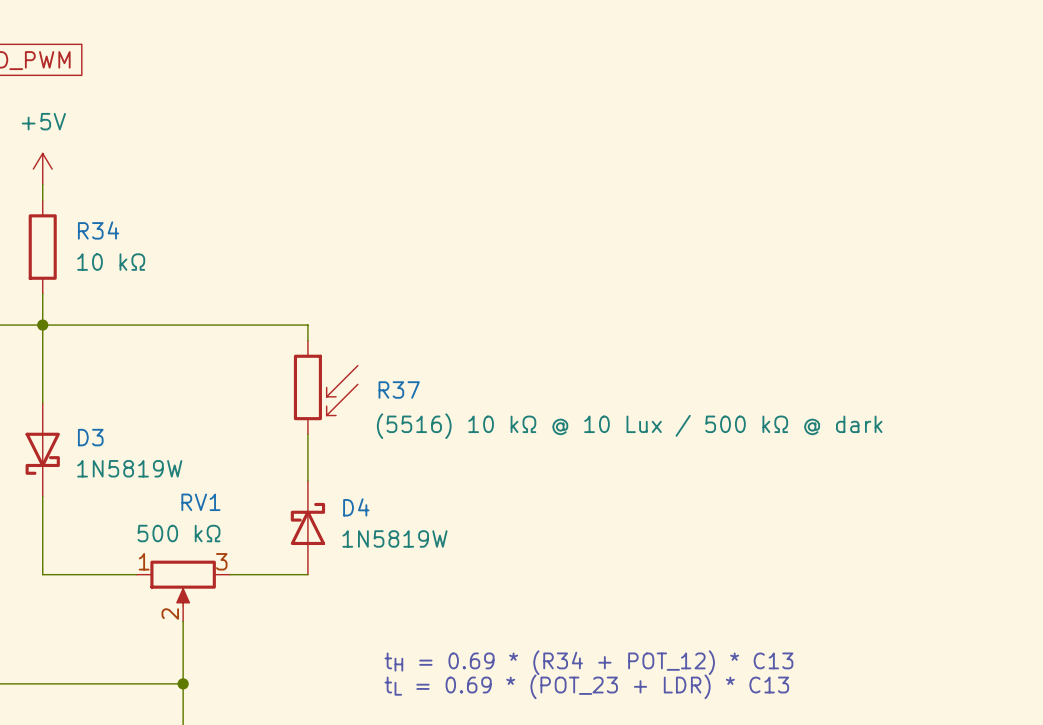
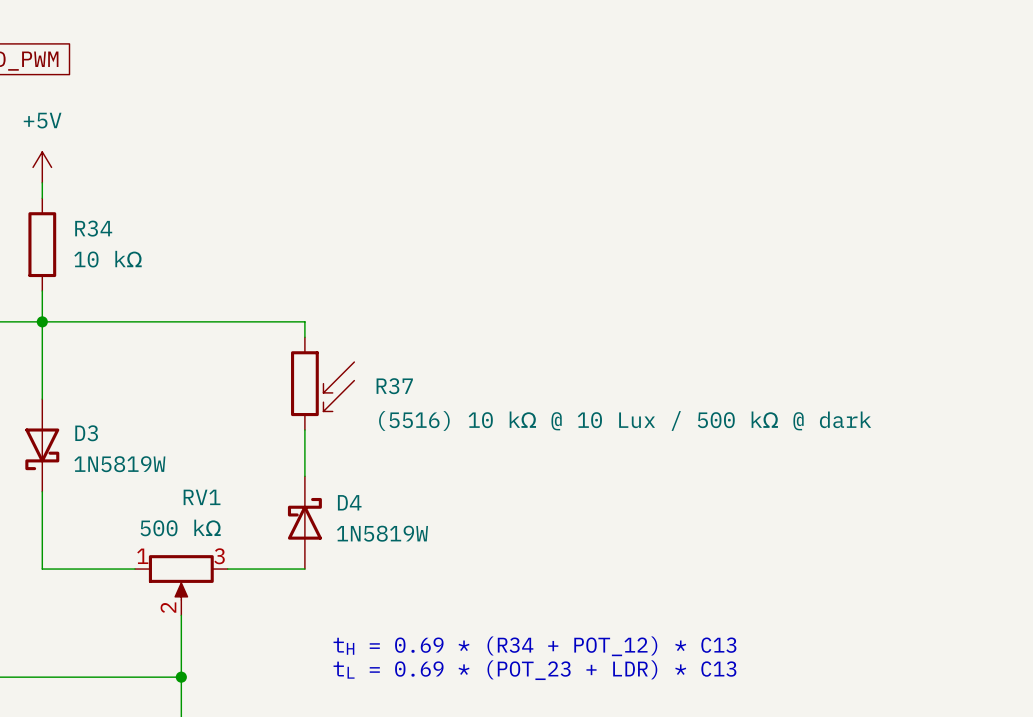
text position: tH = 0.69 * (R34 + POT_12) * C13 (588, 662) -> tH = 0.69 * (R34 + POT_12) * C13 (534, 646)
text position: tL = 0.69 * (POT_23 + LDR) * C13 (586, 686) -> tL = 0.69 * (POT_23 + LDR) * C13 (534, 670)

